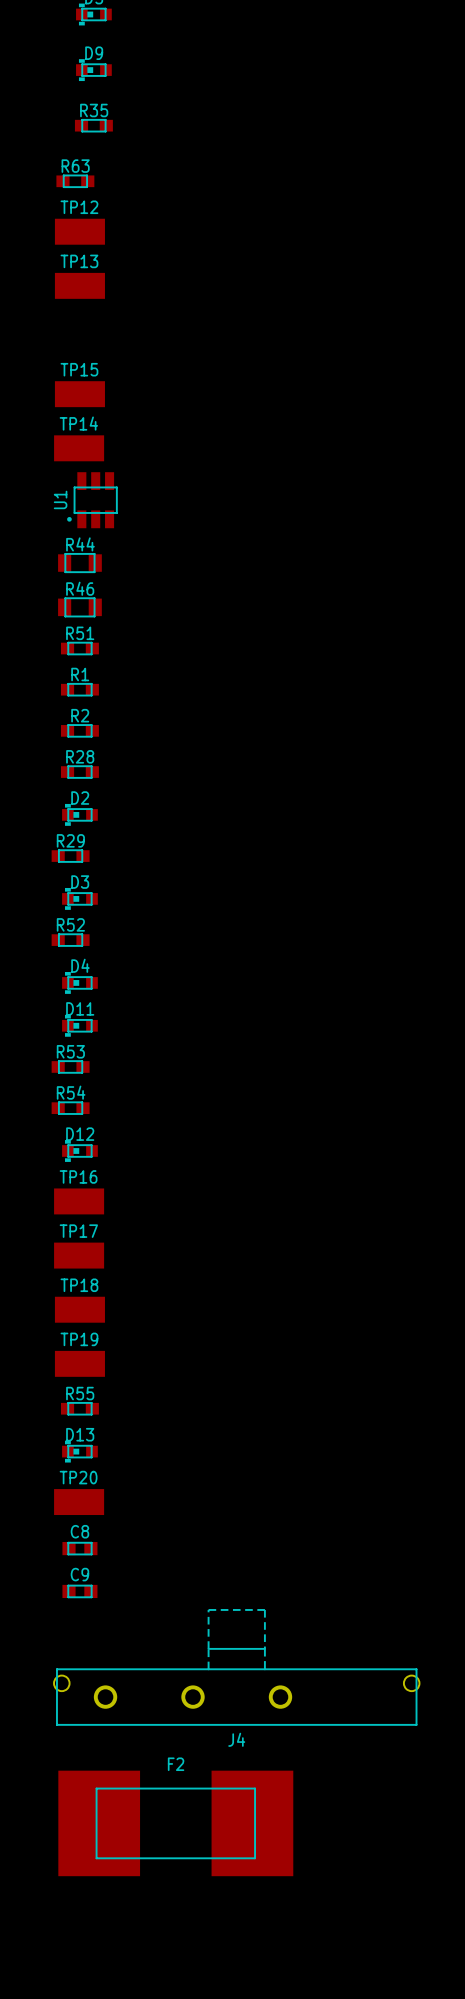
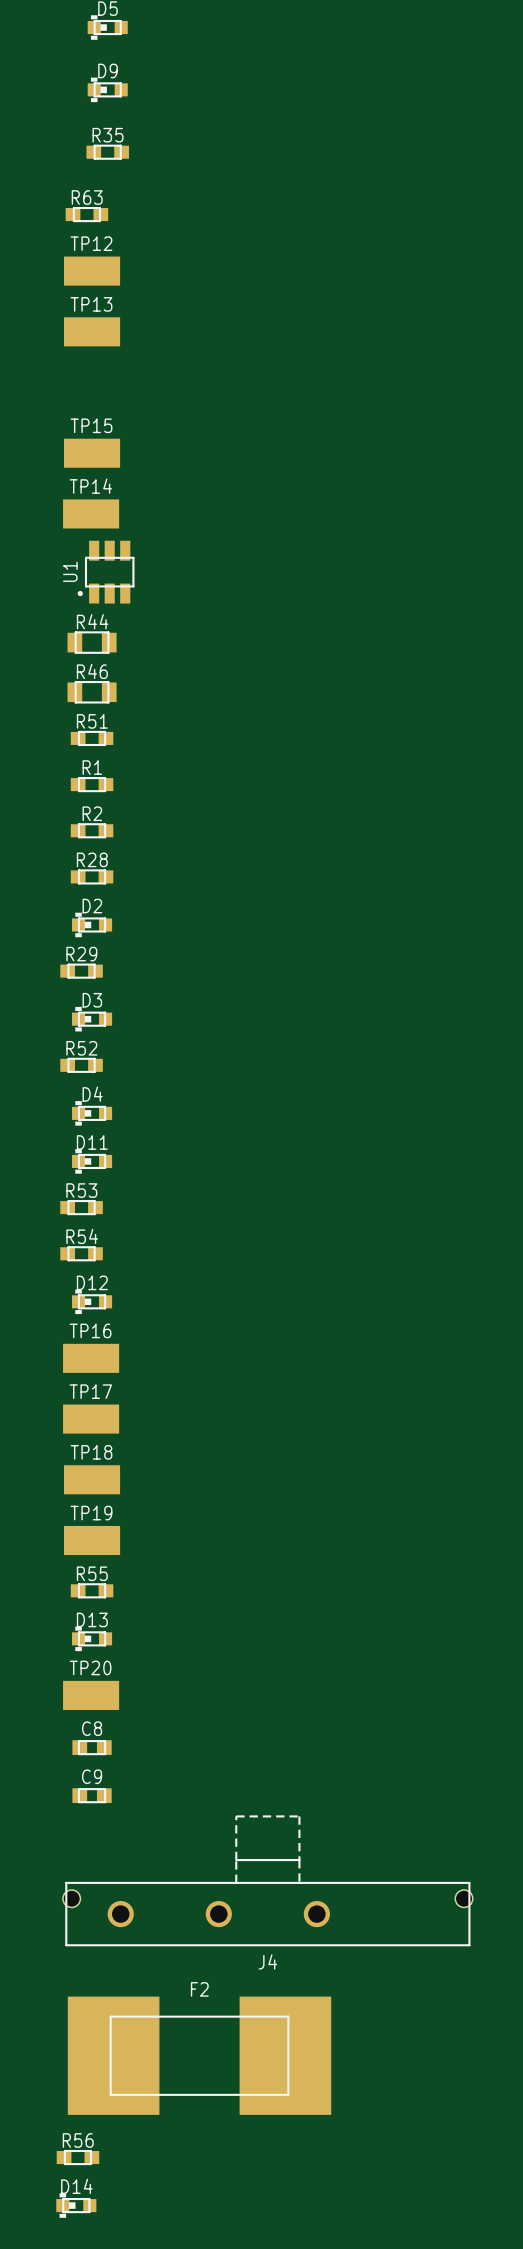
R56: none -> (77, 2157)
D14: none -> (76, 2205)

